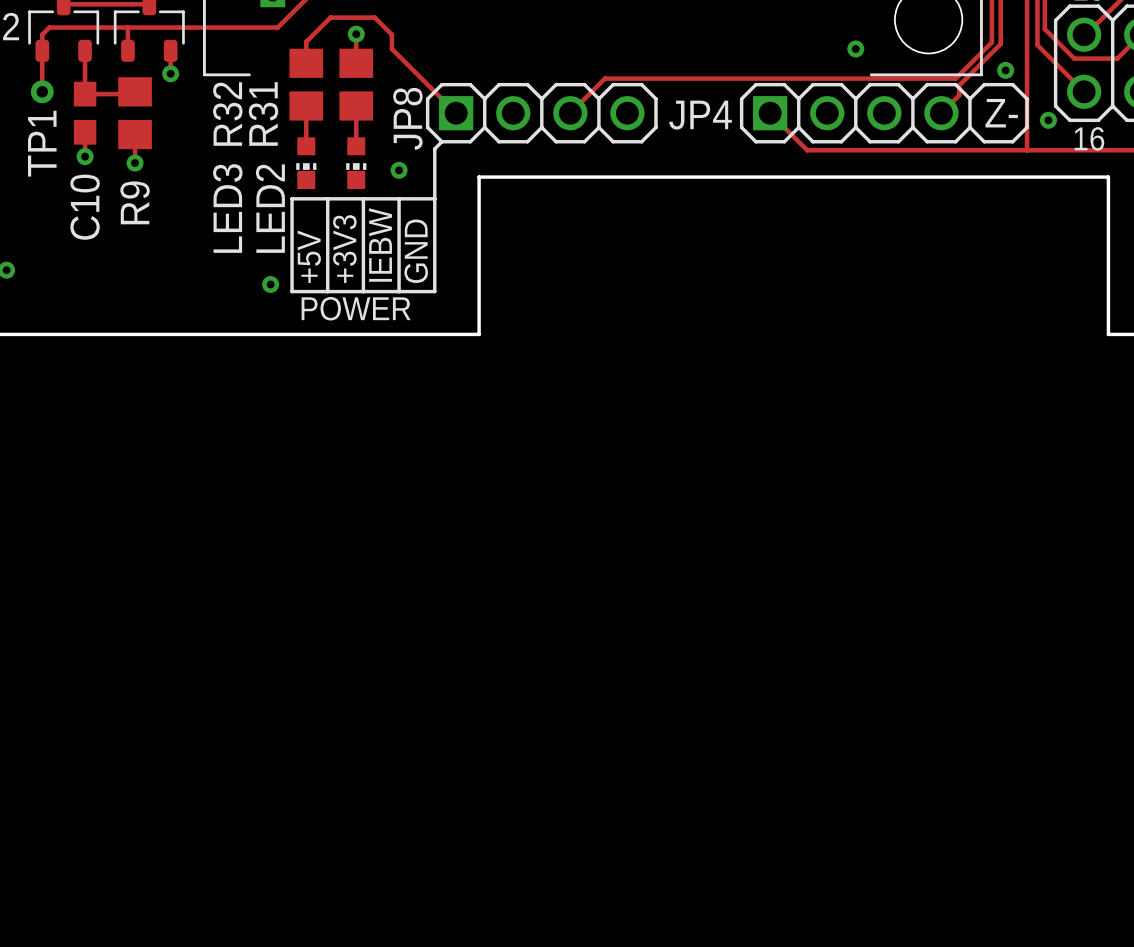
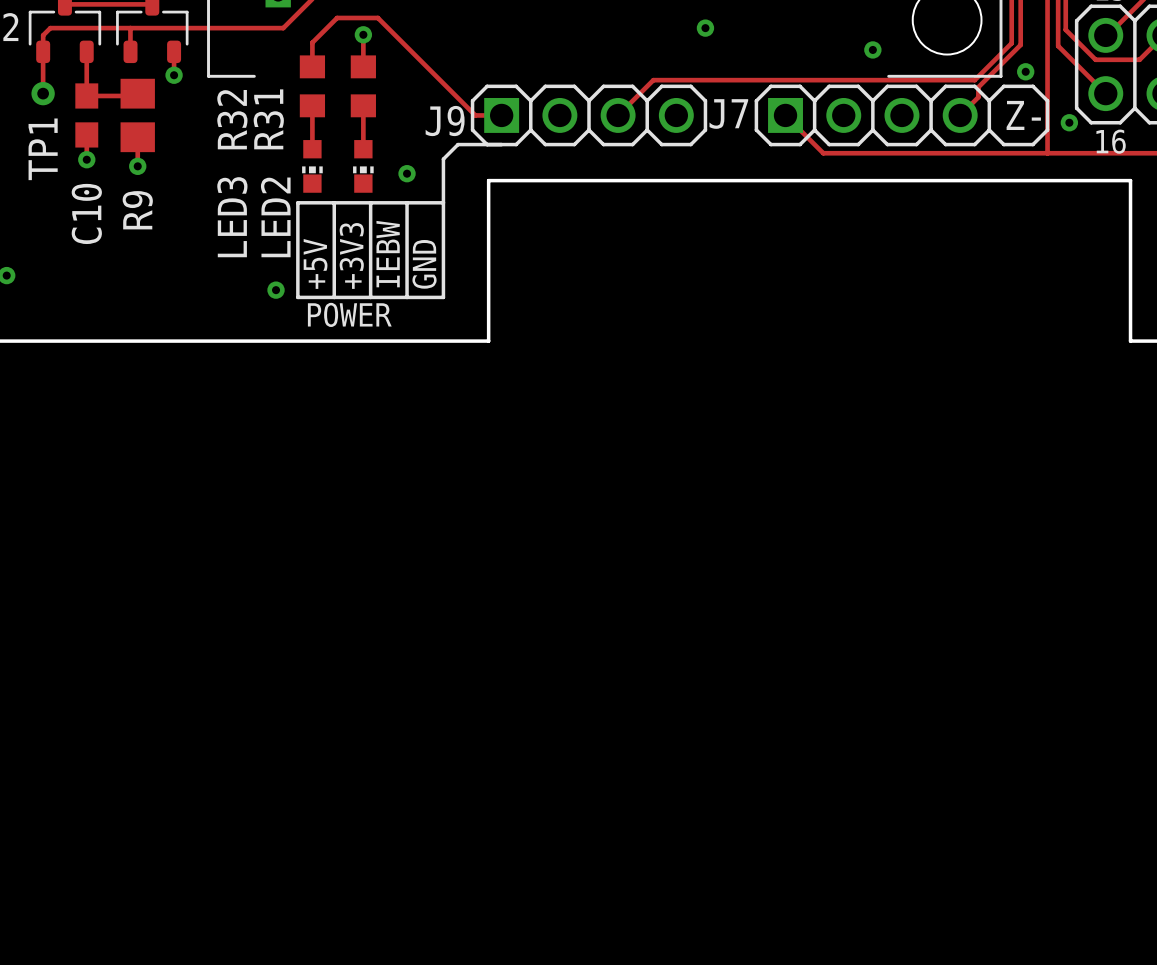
track: (370, 17) (374, 17) (391, 34) (391, 48) (456, 113) -> (377, 17) (475, 115) (501, 115)
via: none -> (705, 28)
R32 footprint: [289, 48, 324, 121] -> [299, 55, 326, 118]
R31 footprint: [339, 48, 374, 121] -> [350, 55, 376, 118]
track: (640, 78) (604, 78) (570, 113) -> (653, 80) (618, 115)
JP8: (541, 113) -> none
J9: none -> (589, 115)
JP4 name: JP4 (700, 115) -> J7 (728, 113)
line: (441, 141) (434, 148) (434, 156) -> (501, 144) (457, 144) (443, 159)

